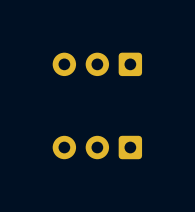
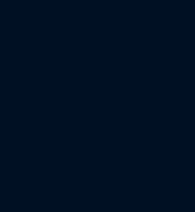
part: (97, 64) -> none
part: (97, 147) -> none

